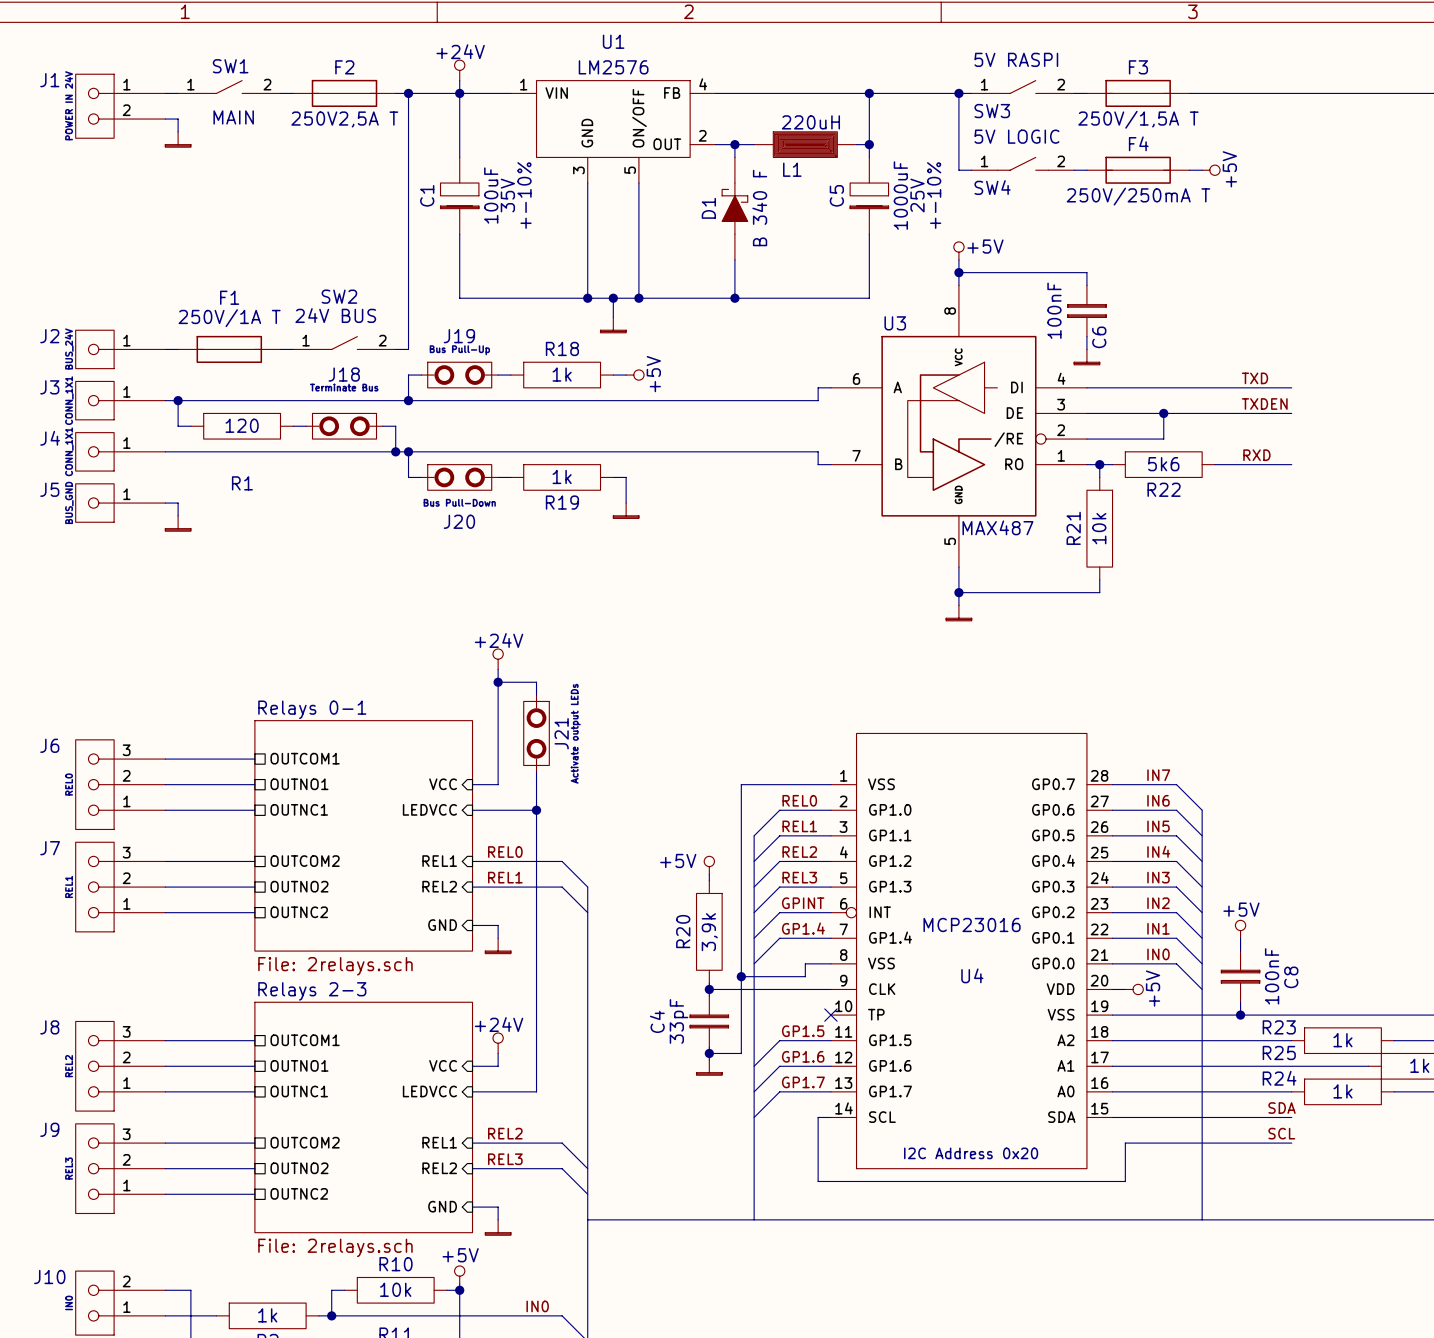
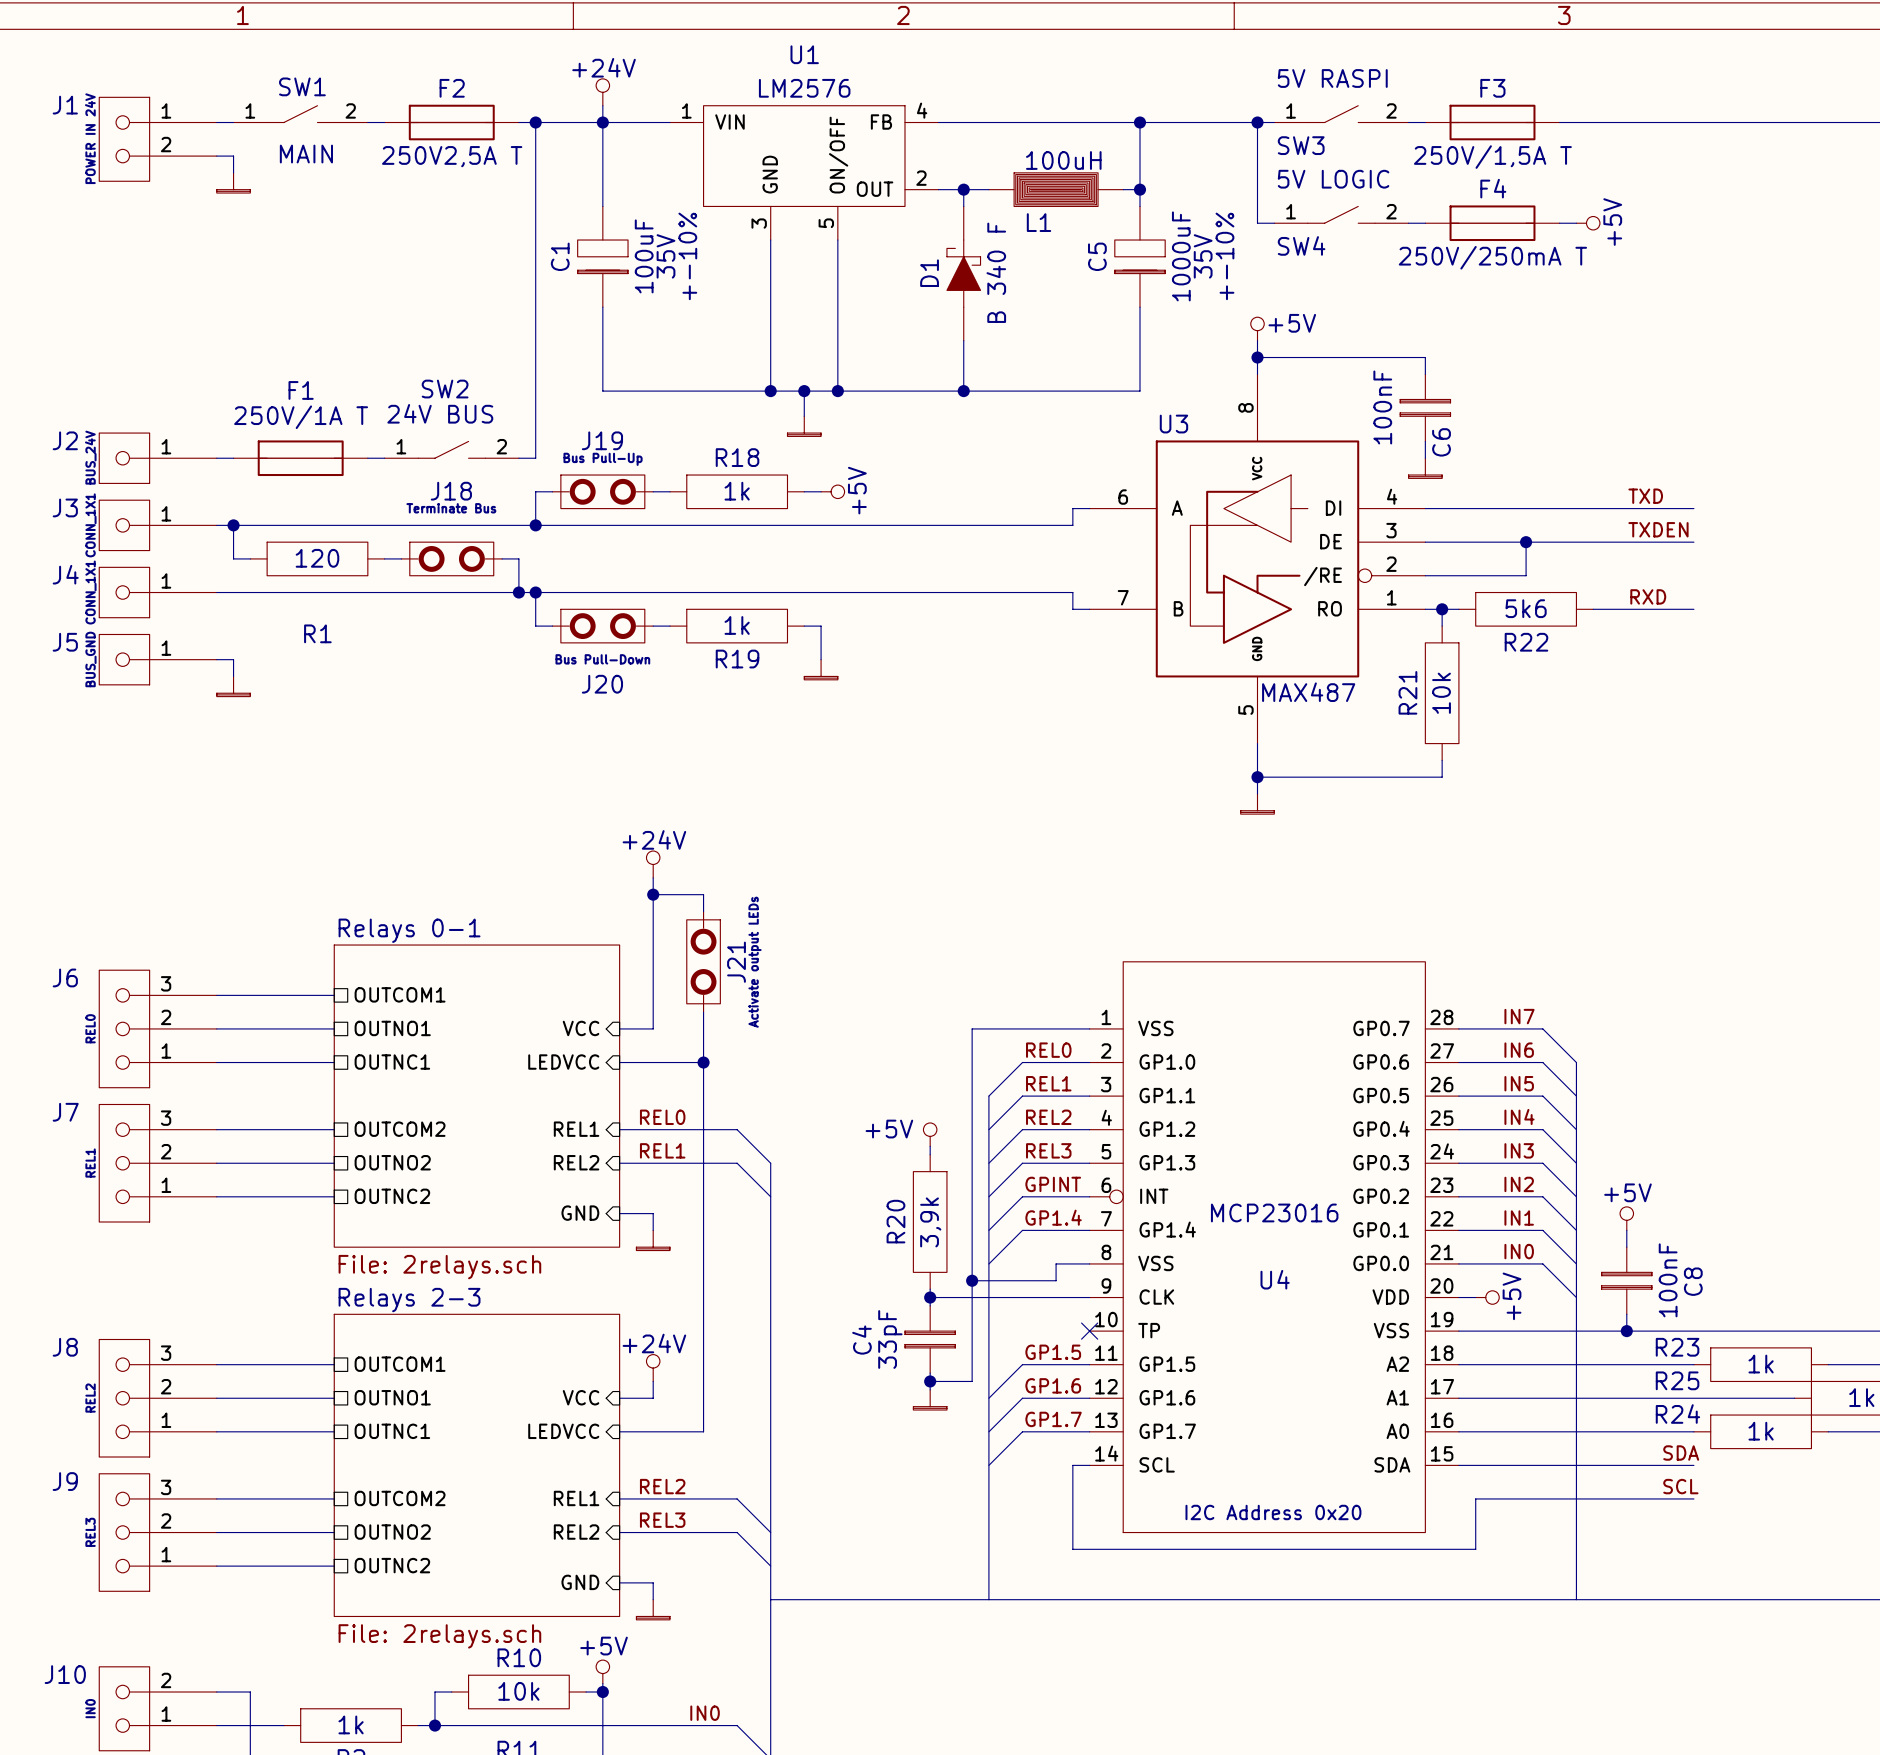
L1 value: 220uH (810, 122) -> 100uH (1063, 160)
C5 text: 25V (917, 195) -> 35V (1203, 256)

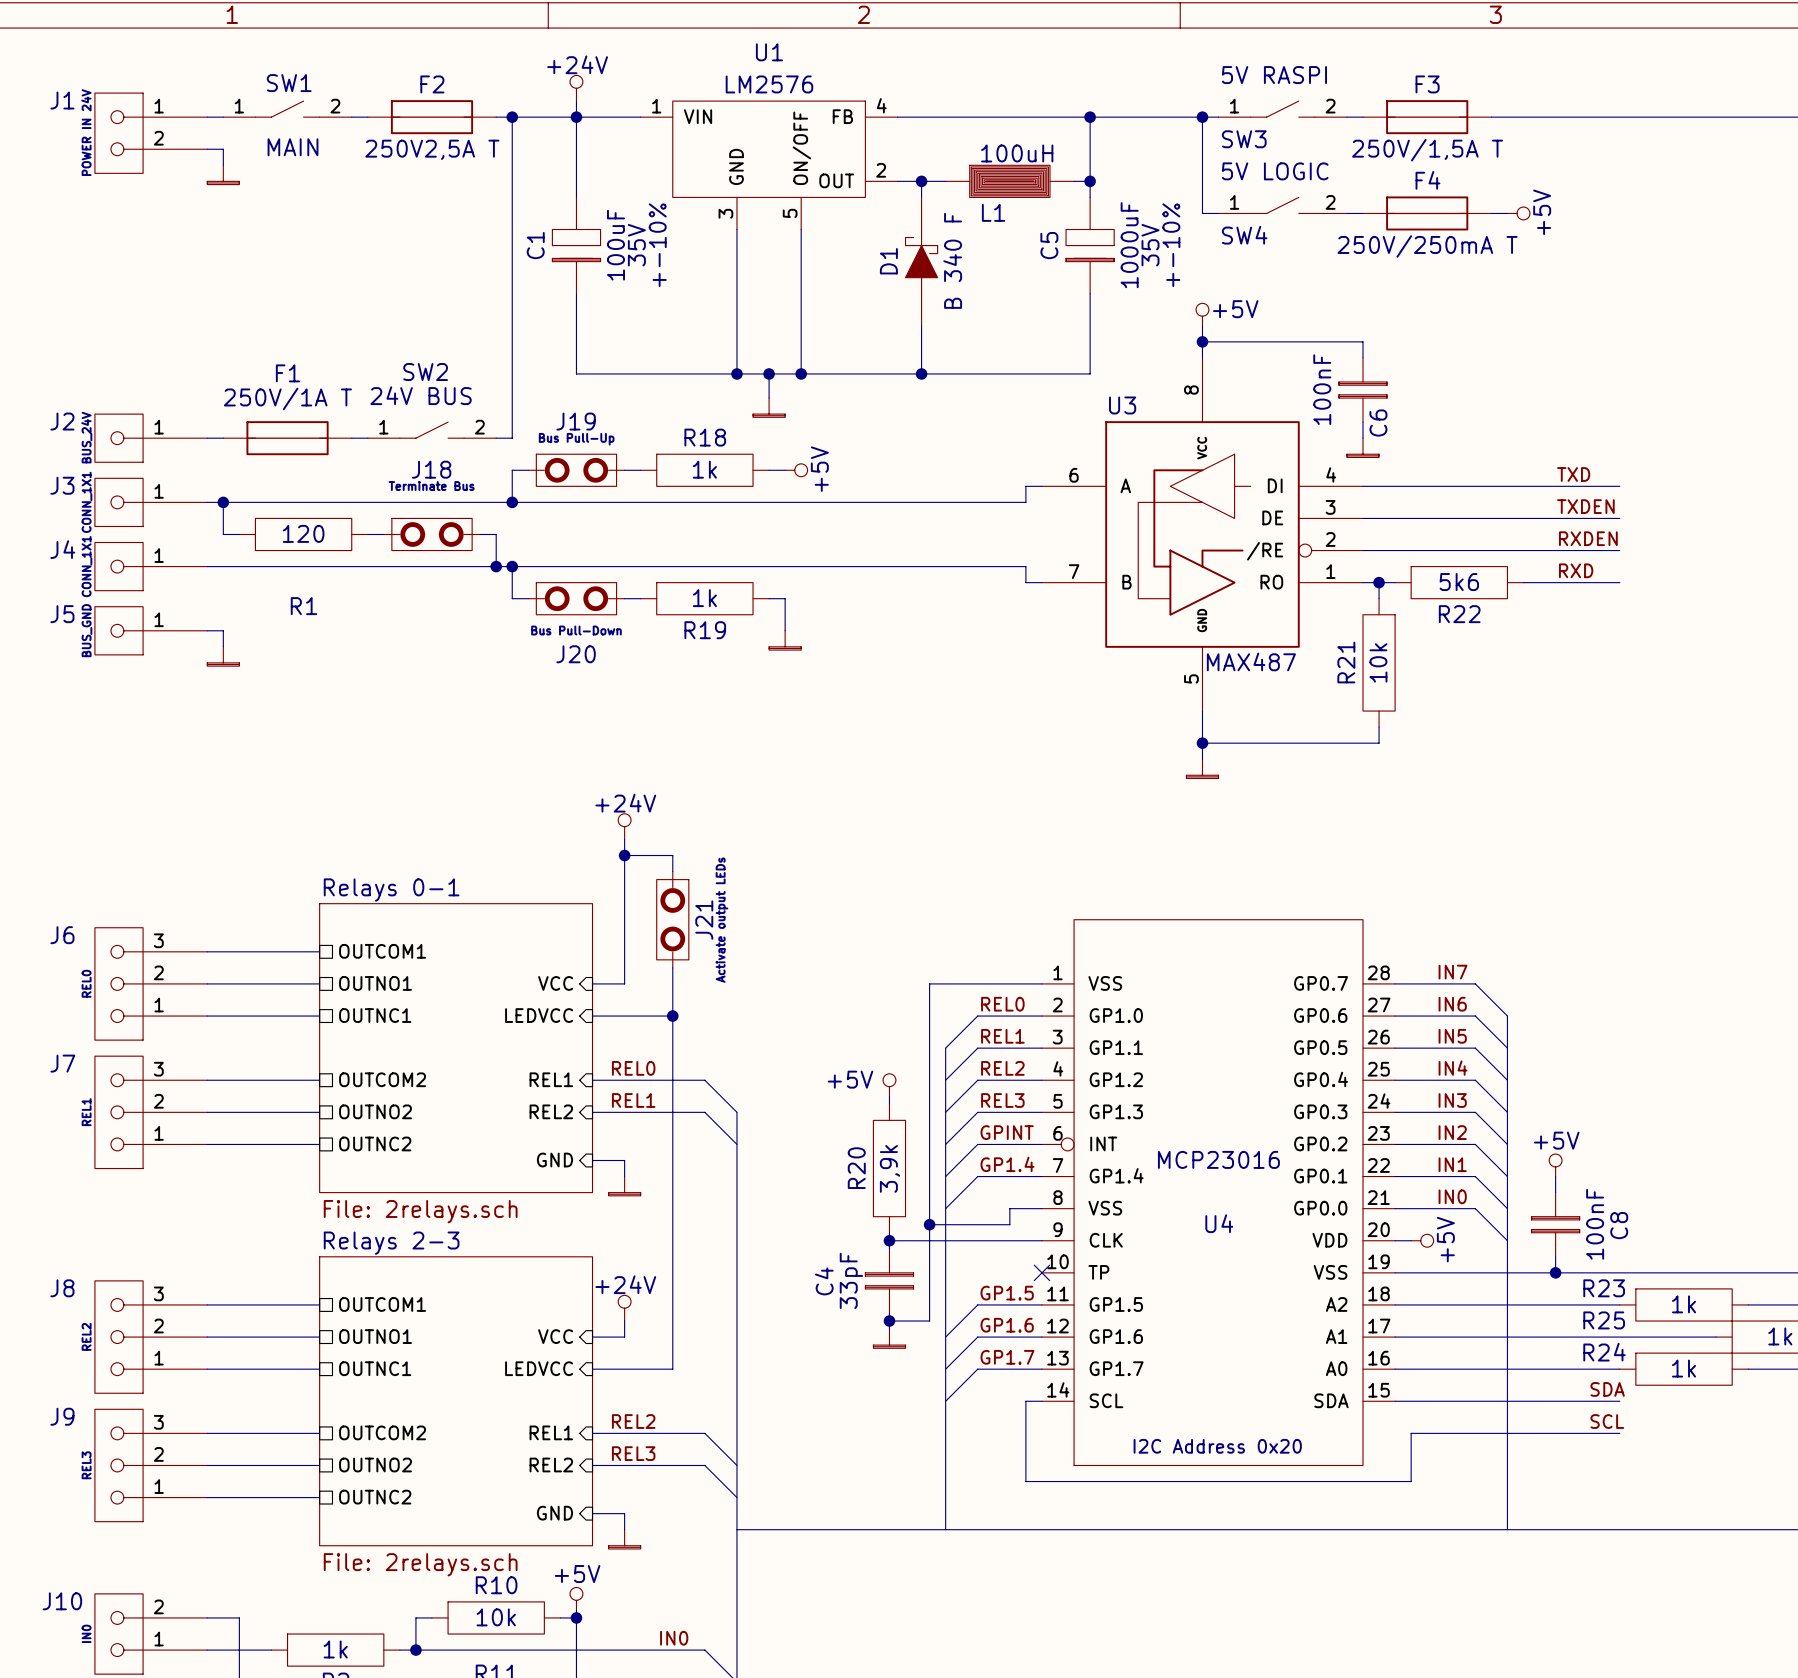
wire: (1526, 542) (1526, 575) -> (1619, 550) (1459, 550)
junction: (1526, 542) -> none
label: none -> RXDEN (1588, 538)

